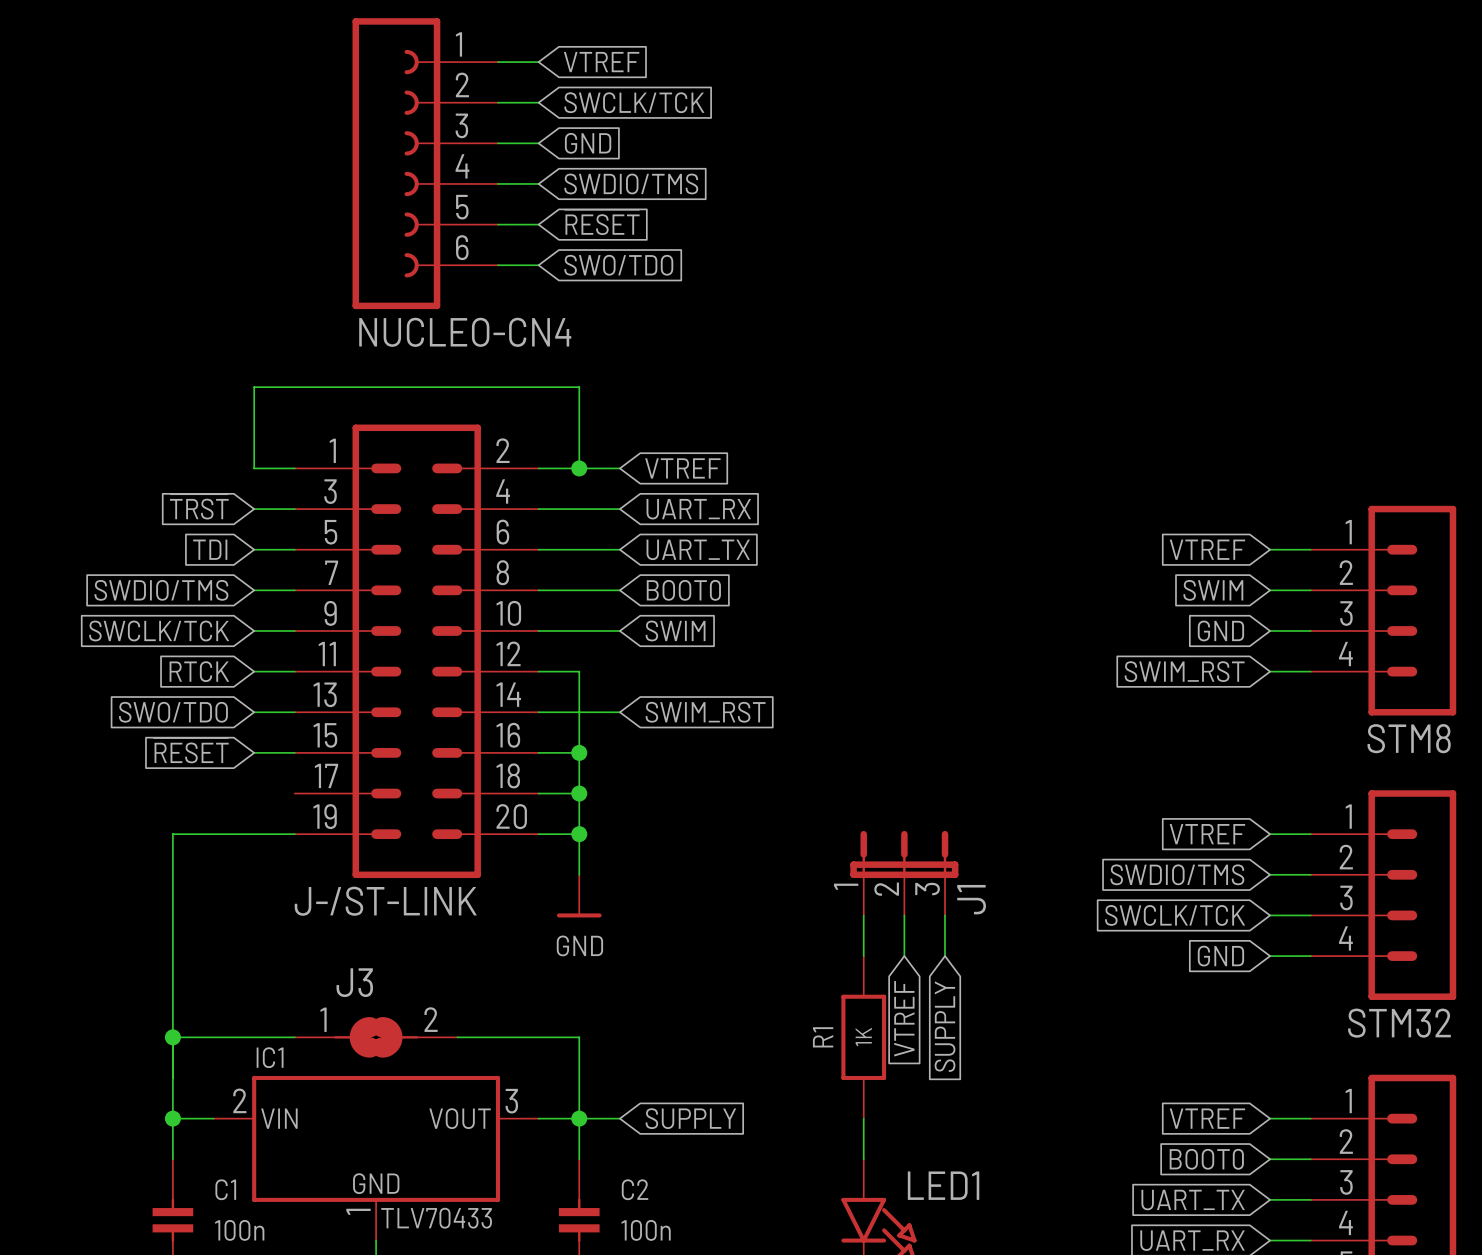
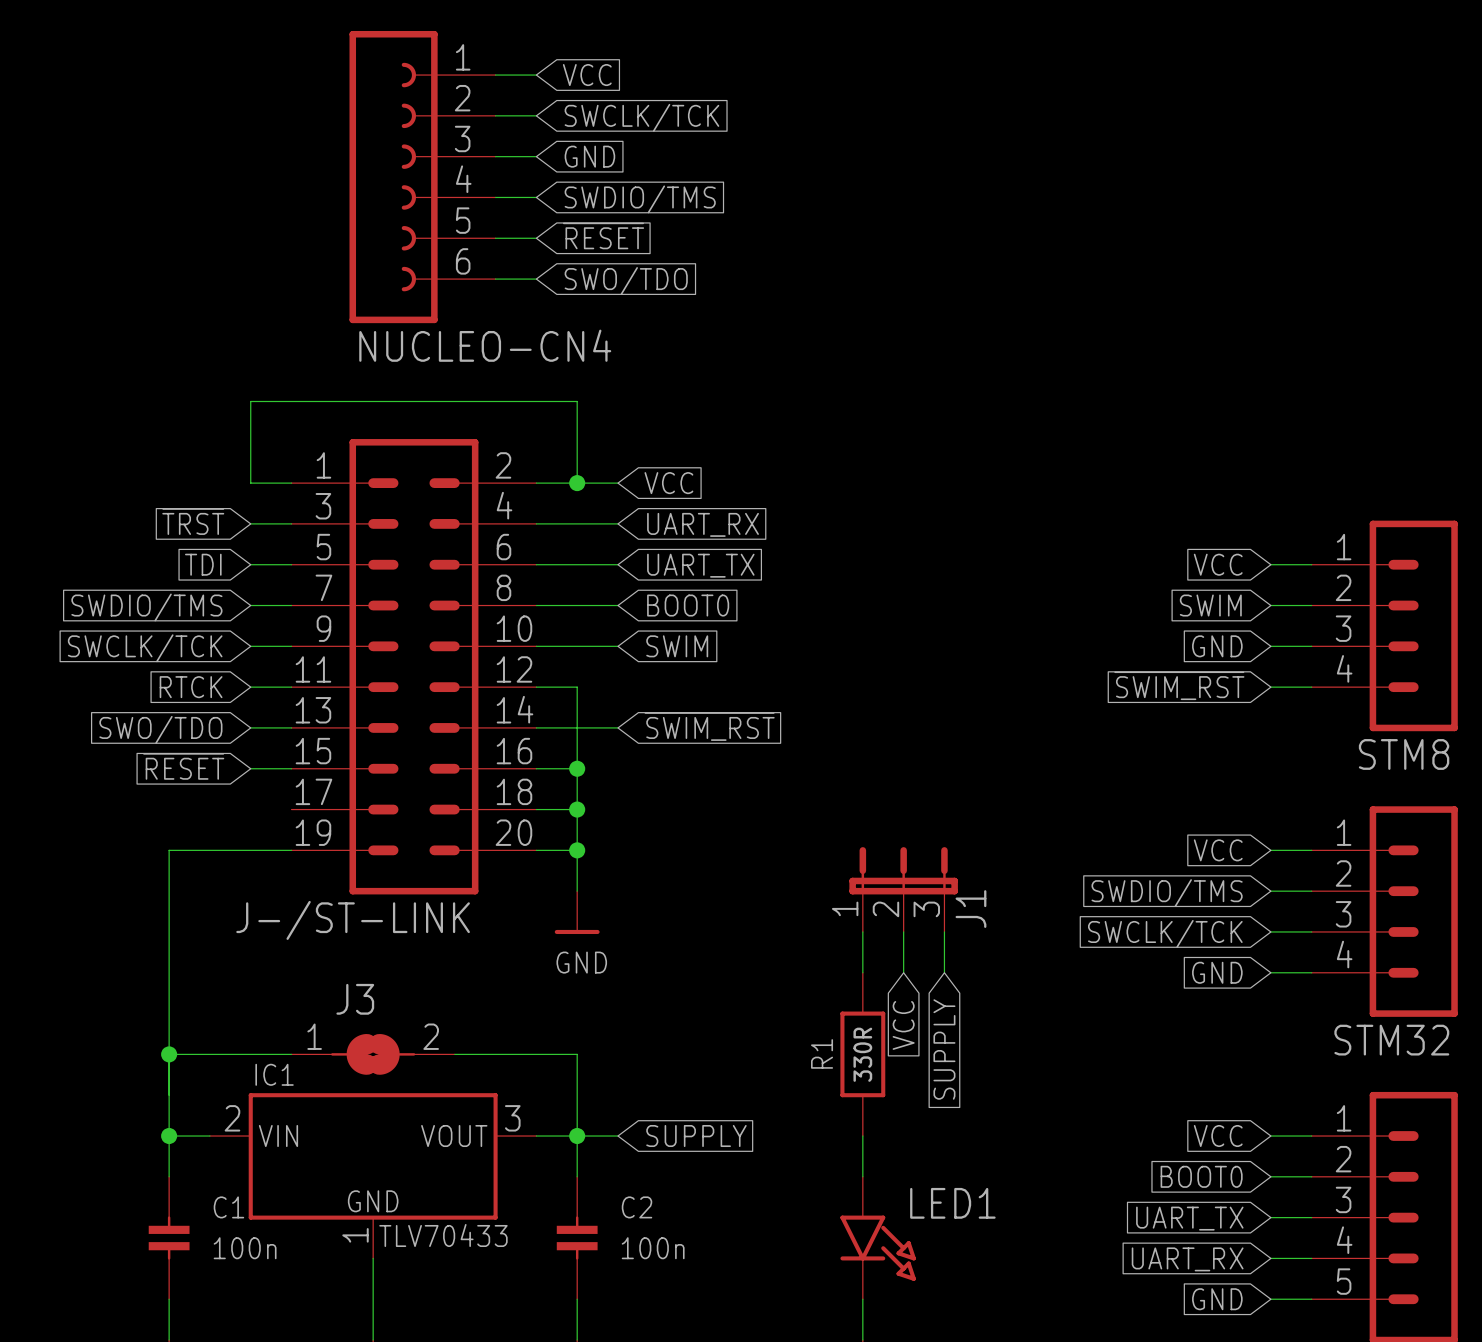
global label: VTREF (601, 62) -> VCC (587, 75)
global label: VTREF (682, 468) -> VCC (668, 483)
global label: VTREF (1207, 549) -> VCC (1218, 564)
global label: SWIM_RST (1184, 671) -> ~{SWIM_RST} (1179, 685)
global label: SWIM_RST (705, 712) -> ~{SWIM_RST} (709, 726)
global label: VTREF (1207, 834) -> VCC (1218, 850)
global label: VTREF (904, 1018) -> VCC (903, 1025)
R1 value: 1K (863, 1037) -> 330R (862, 1054)
global label: VTREF (1207, 1118) -> VCC (1218, 1136)

